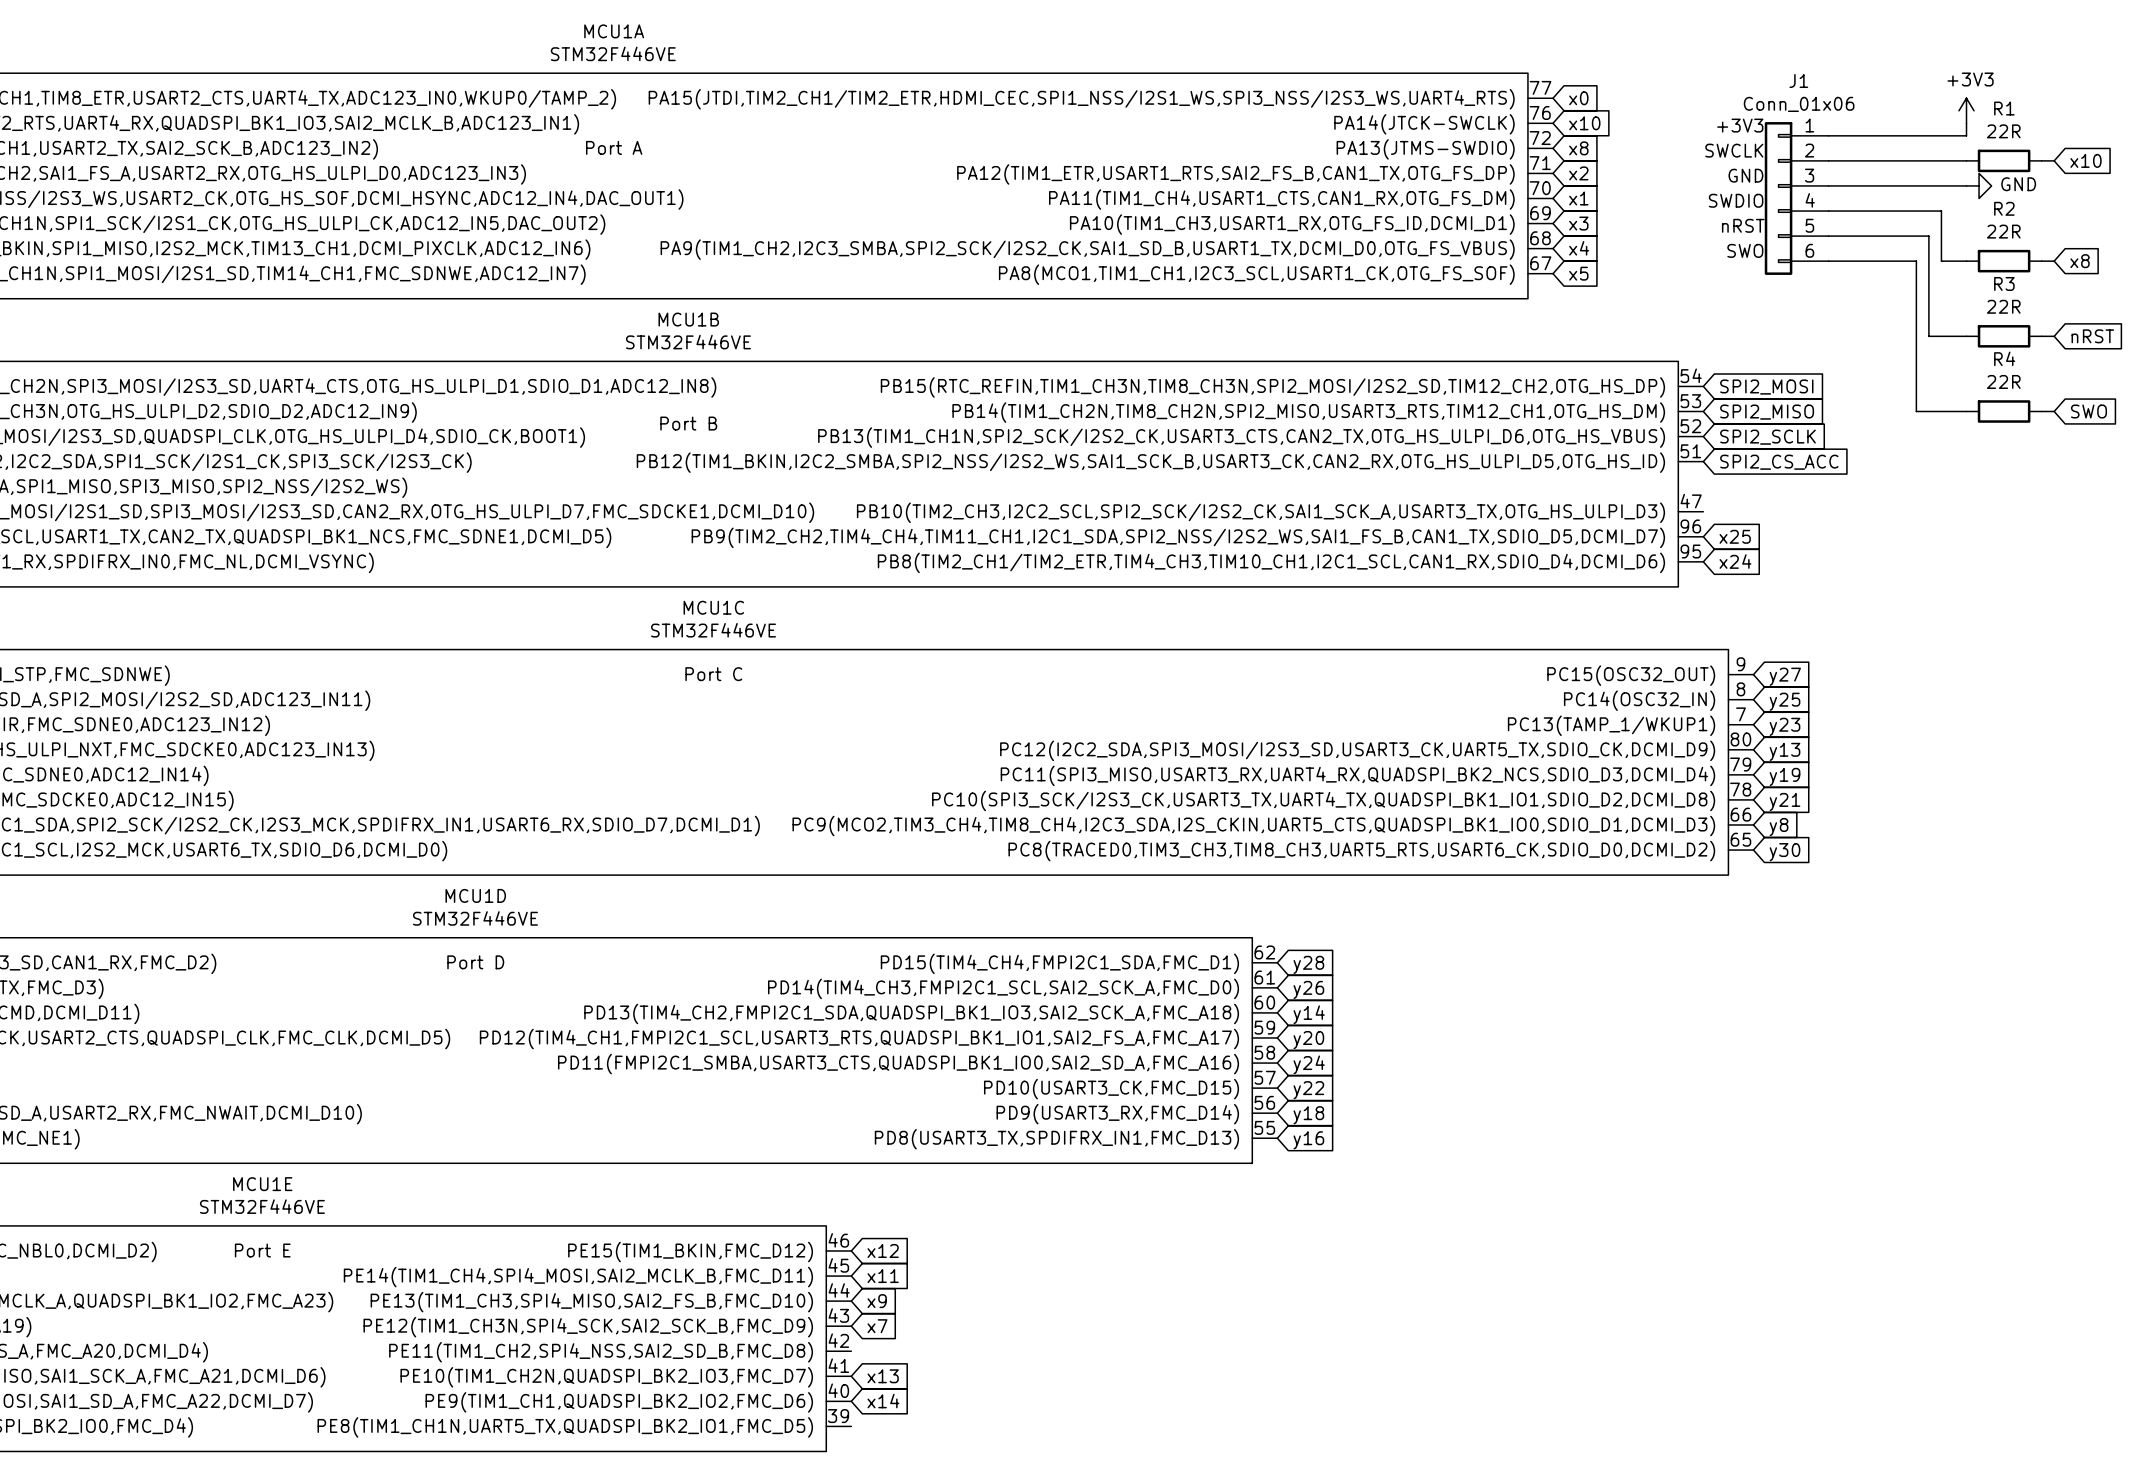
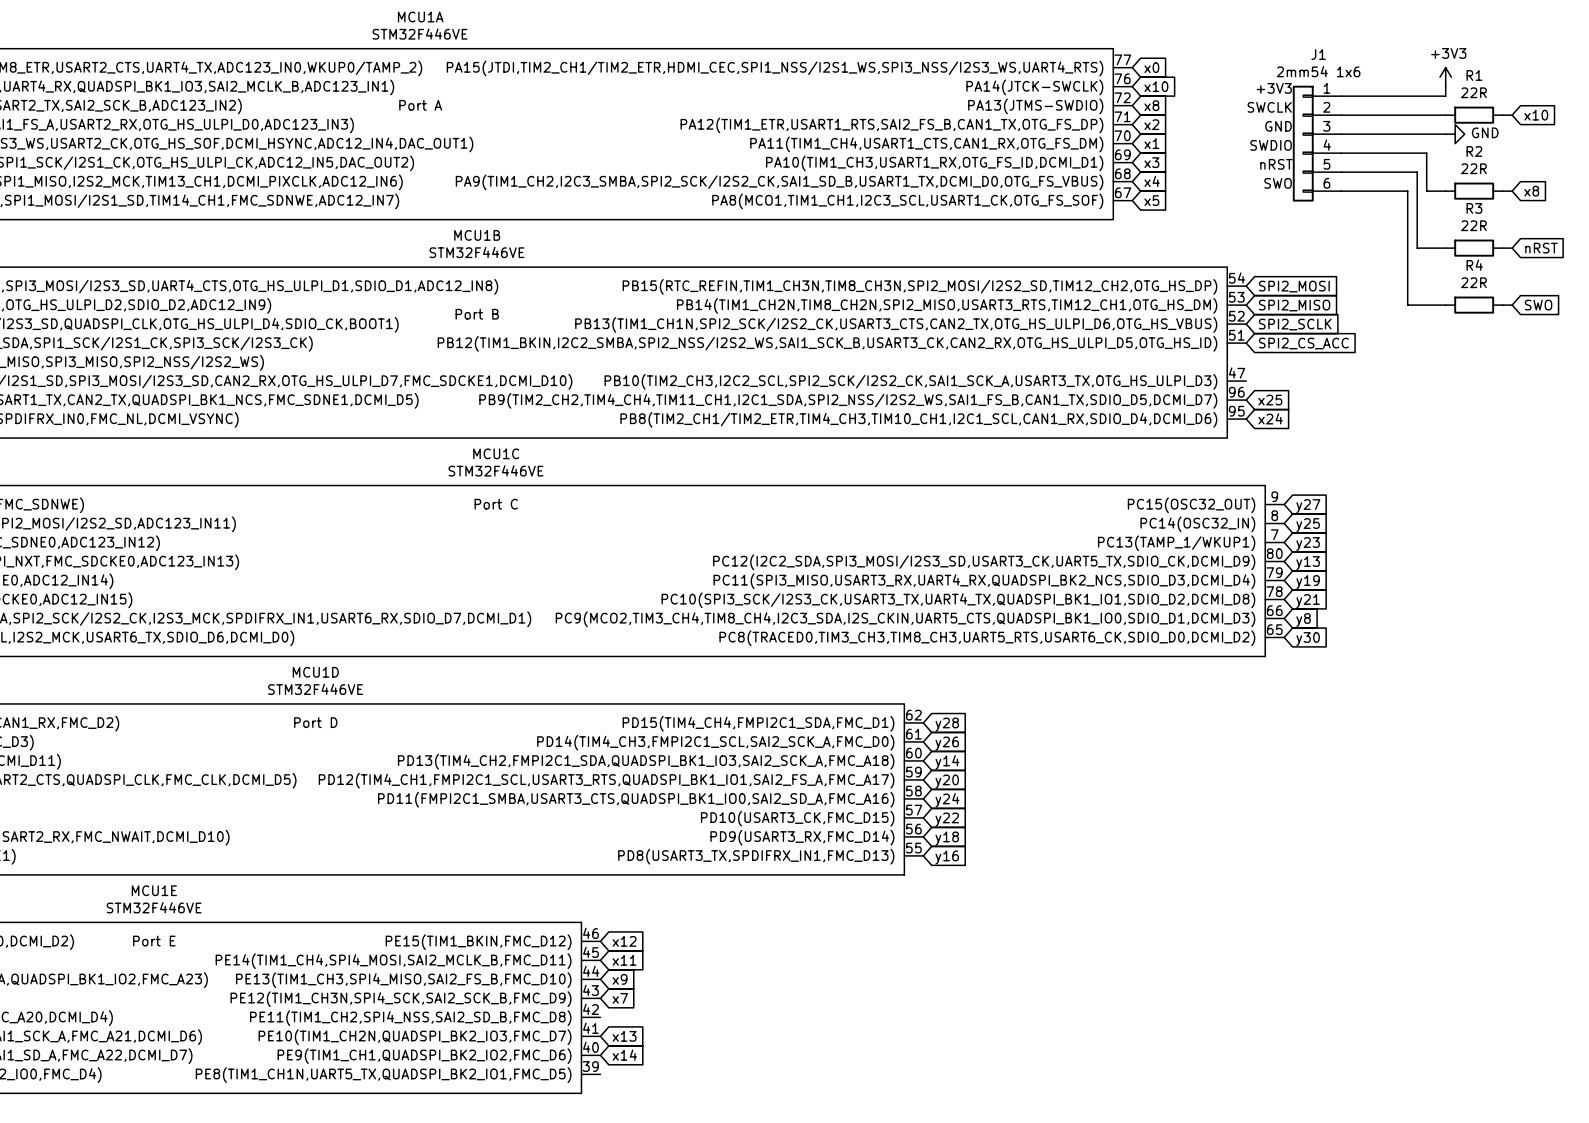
J1 value: Conn_01x06 (1799, 104) -> 2mm54 1x6 (1318, 71)

